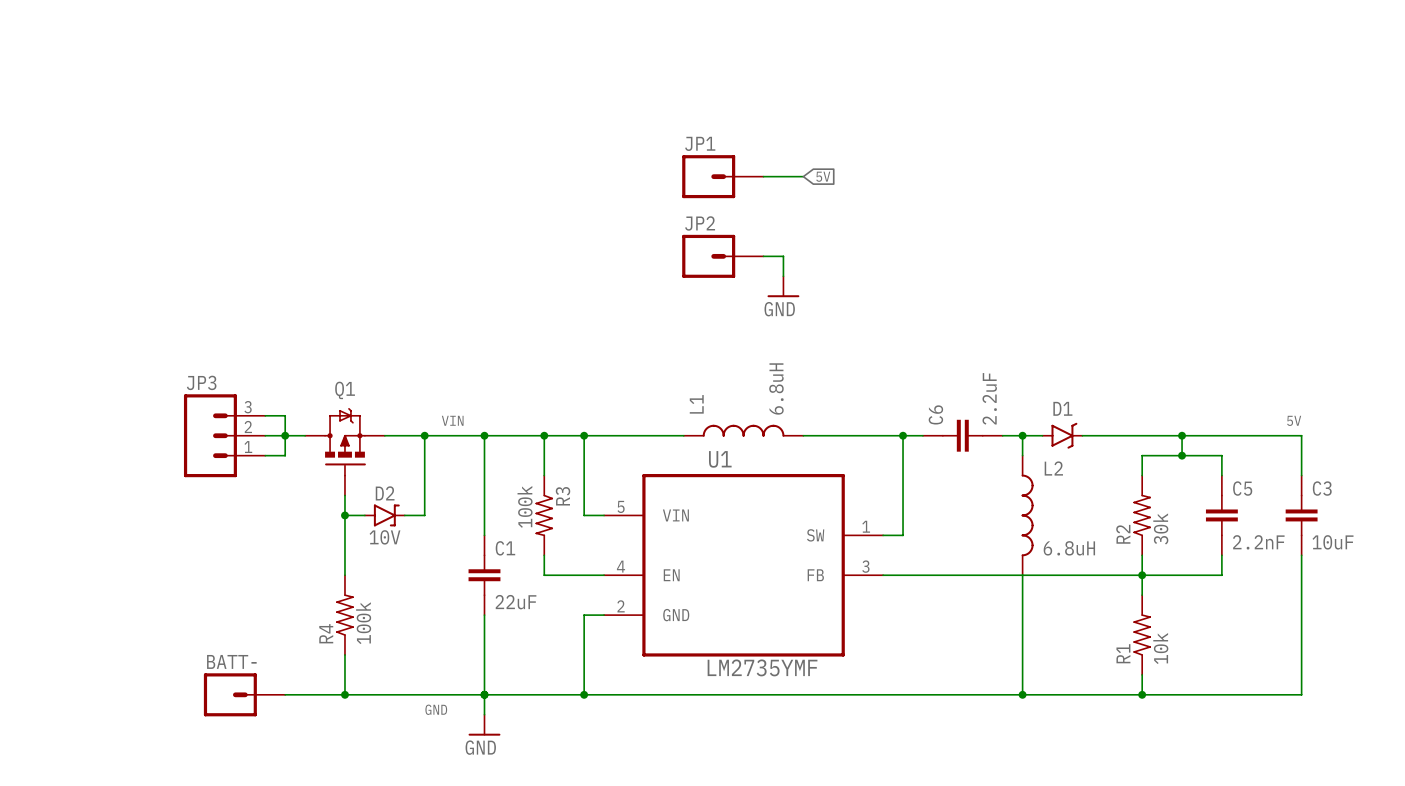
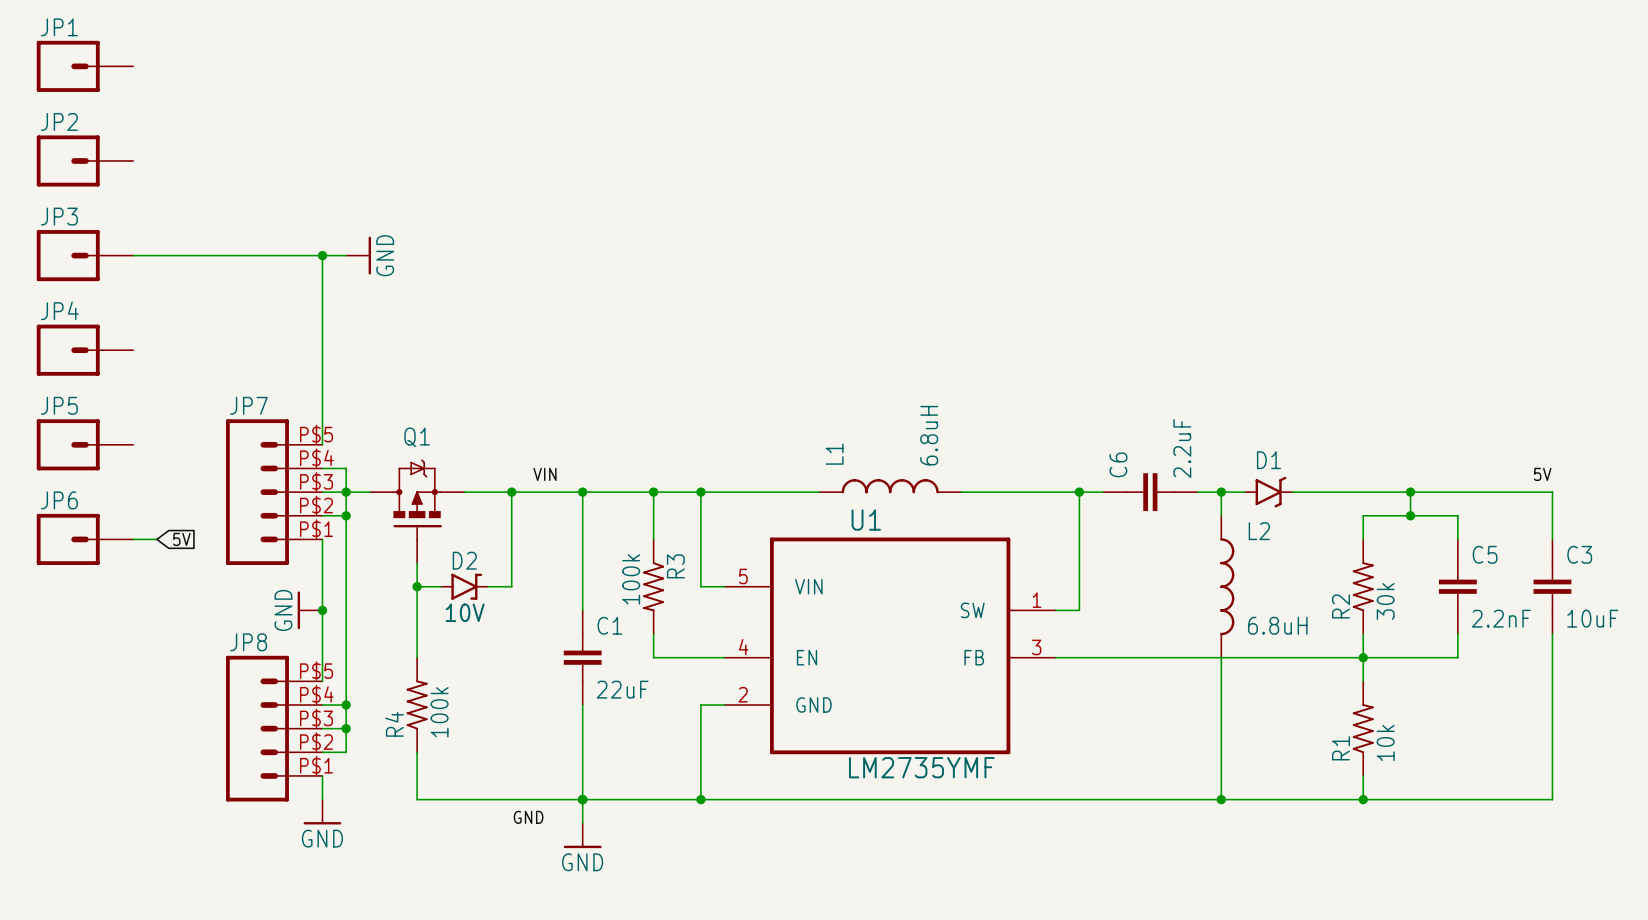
JP1 position: (722, 176) -> (85, 66)
wire: (763, 176) (803, 176) -> none
global label: 5V (823, 176) -> none
wire: none -> (133, 255) (346, 255)
wire: none -> (322, 255) (322, 444)
junction: none -> (322, 255)
power symbol: none -> GND (358, 255)
JP2 position: (722, 256) -> (85, 160)
wire: (763, 256) (783, 256) (783, 276) -> none
power symbol: GND (783, 286) -> none
JP4: none -> (85, 350)
JP3 name position: JP3 (201, 382) -> JP3 (59, 216)
JP3 symbol: [183, 394, 266, 478] -> [36, 230, 134, 282]
JP5: none -> (85, 444)
JP7: none -> (274, 492)
wire: none -> (346, 515) (346, 752) (322, 752)
junction: none -> (346, 515)
JP6: none -> (85, 539)
wire: none -> (133, 539) (156, 539)
global label: none -> 5V (181, 539)
wire: none -> (322, 539) (322, 681)
power symbol: none -> GND (310, 610)
junction: none -> (322, 610)
wire: none -> (322, 705) (346, 705)
junction: none -> (346, 705)
JP8: none -> (274, 728)
wire: none -> (322, 728) (346, 728)
junction: none -> (346, 728)
wire: none -> (322, 775) (322, 799)
BATT-: (244, 694) -> none
wire: (285, 694) (344, 694) -> none
junction: (344, 694) -> none
power symbol: none -> GND (322, 812)

